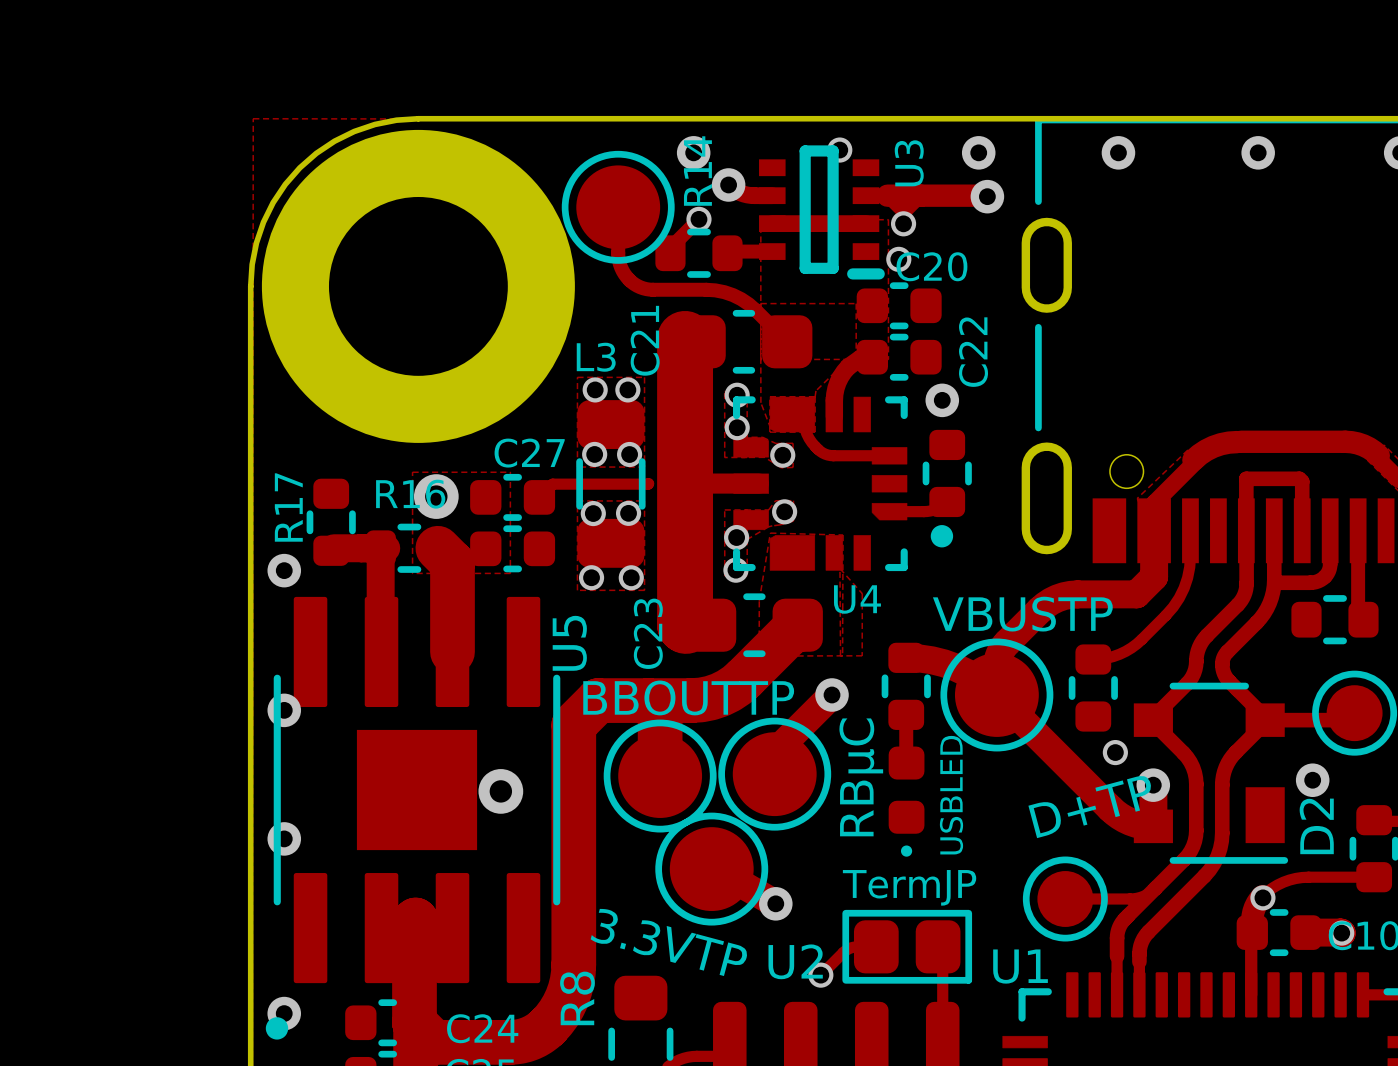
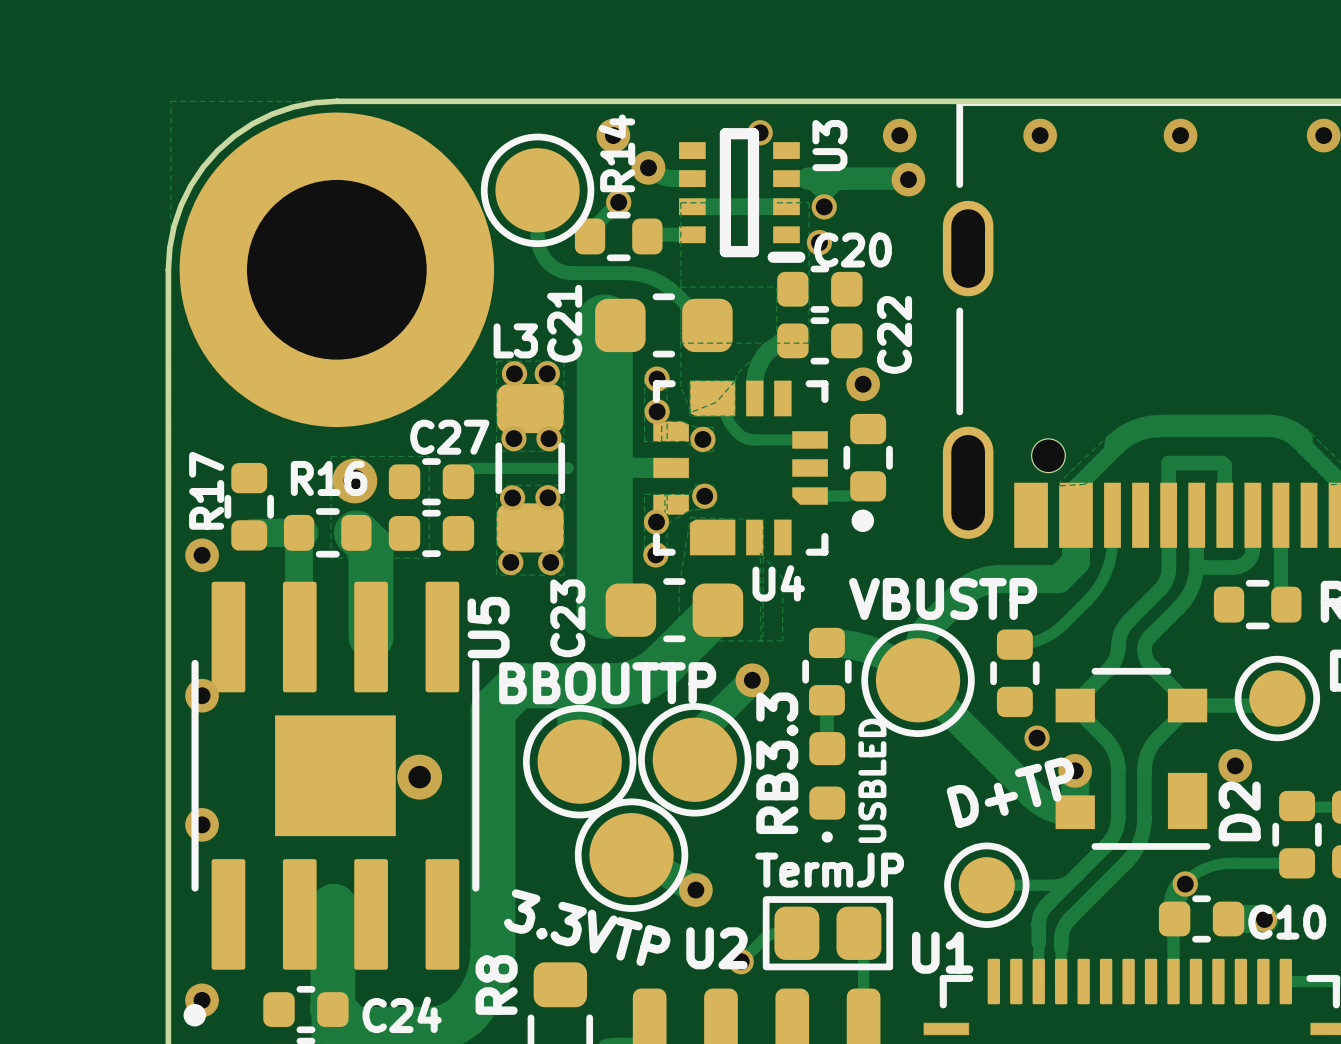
part text: RBμC (861, 777) -> RB3.3 (777, 763)

